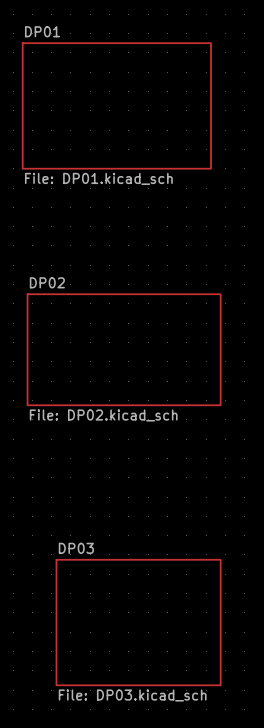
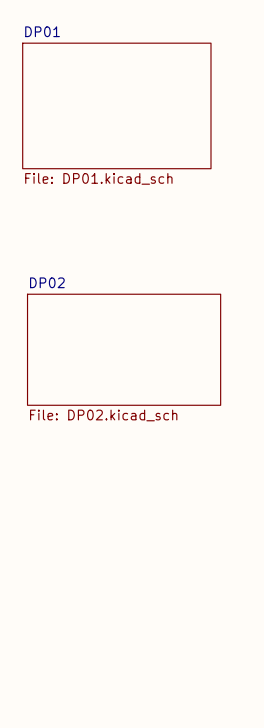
sheet DP03: File: DP03.kicad_sch (138, 622) -> none

